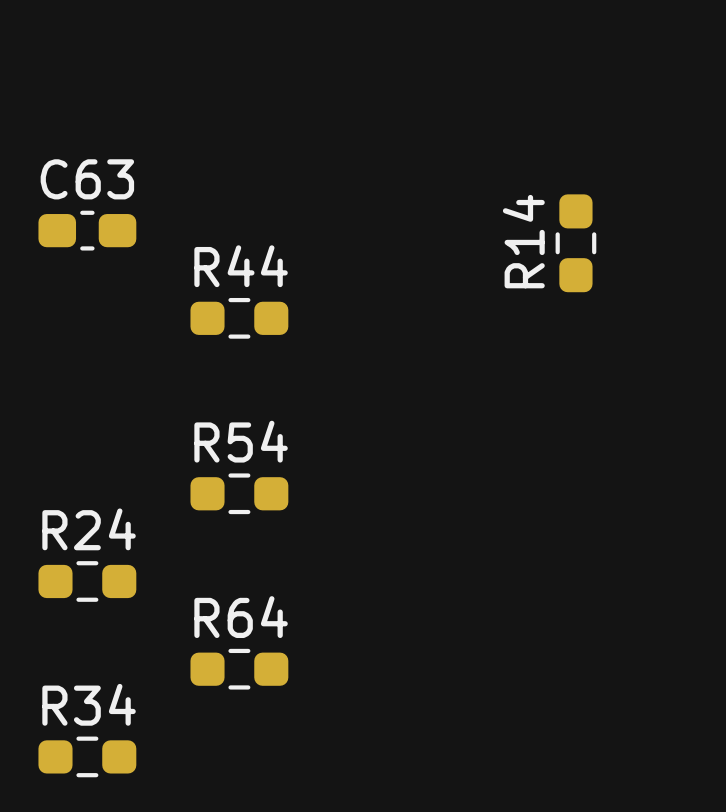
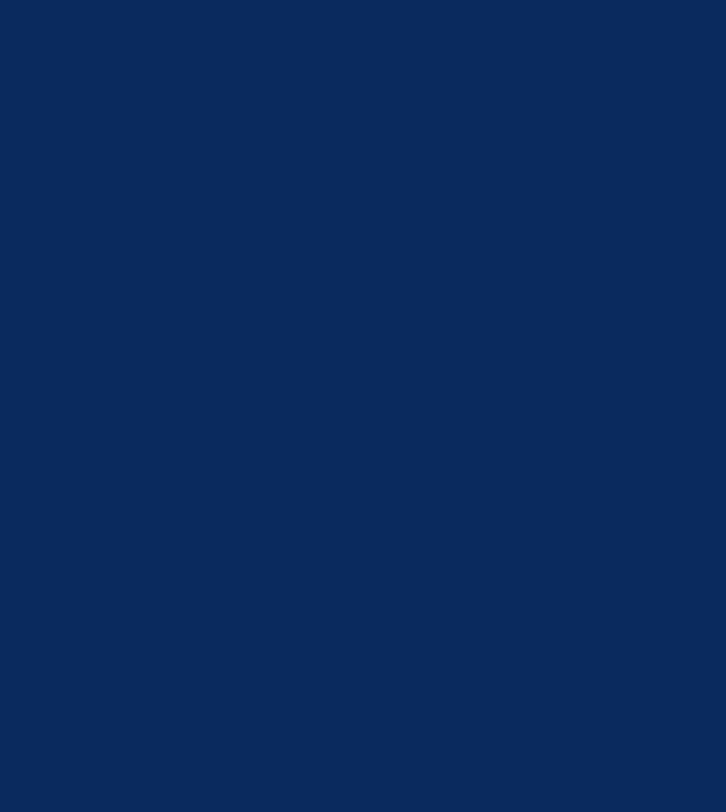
C63: (87, 230) -> none
R14: (575, 243) -> none
R44: (239, 318) -> none
R54: (239, 493) -> none
R24: (87, 581) -> none
R64: (239, 669) -> none
R34: (87, 756) -> none

